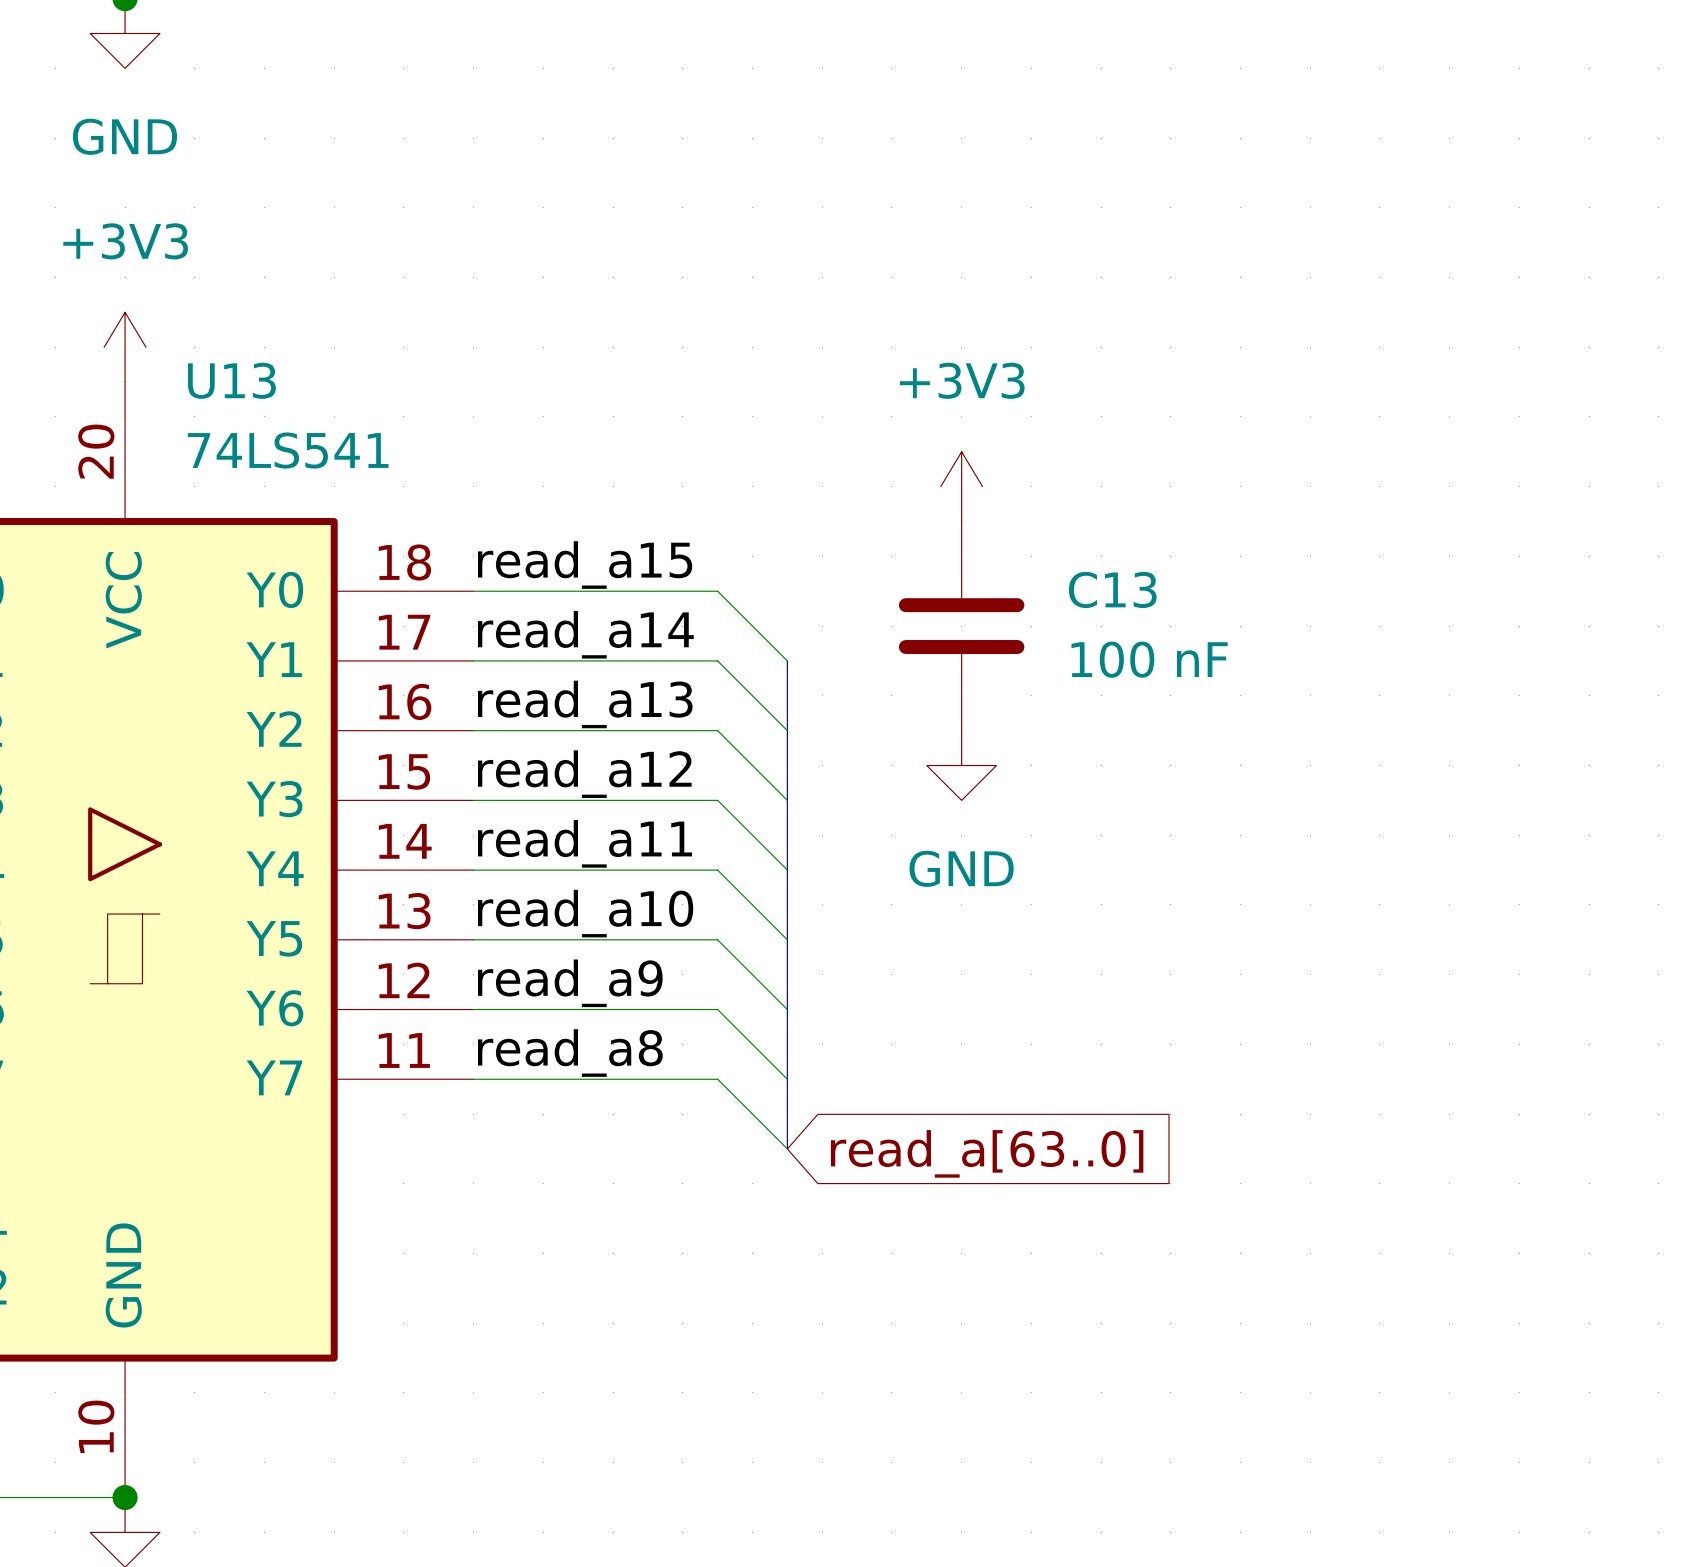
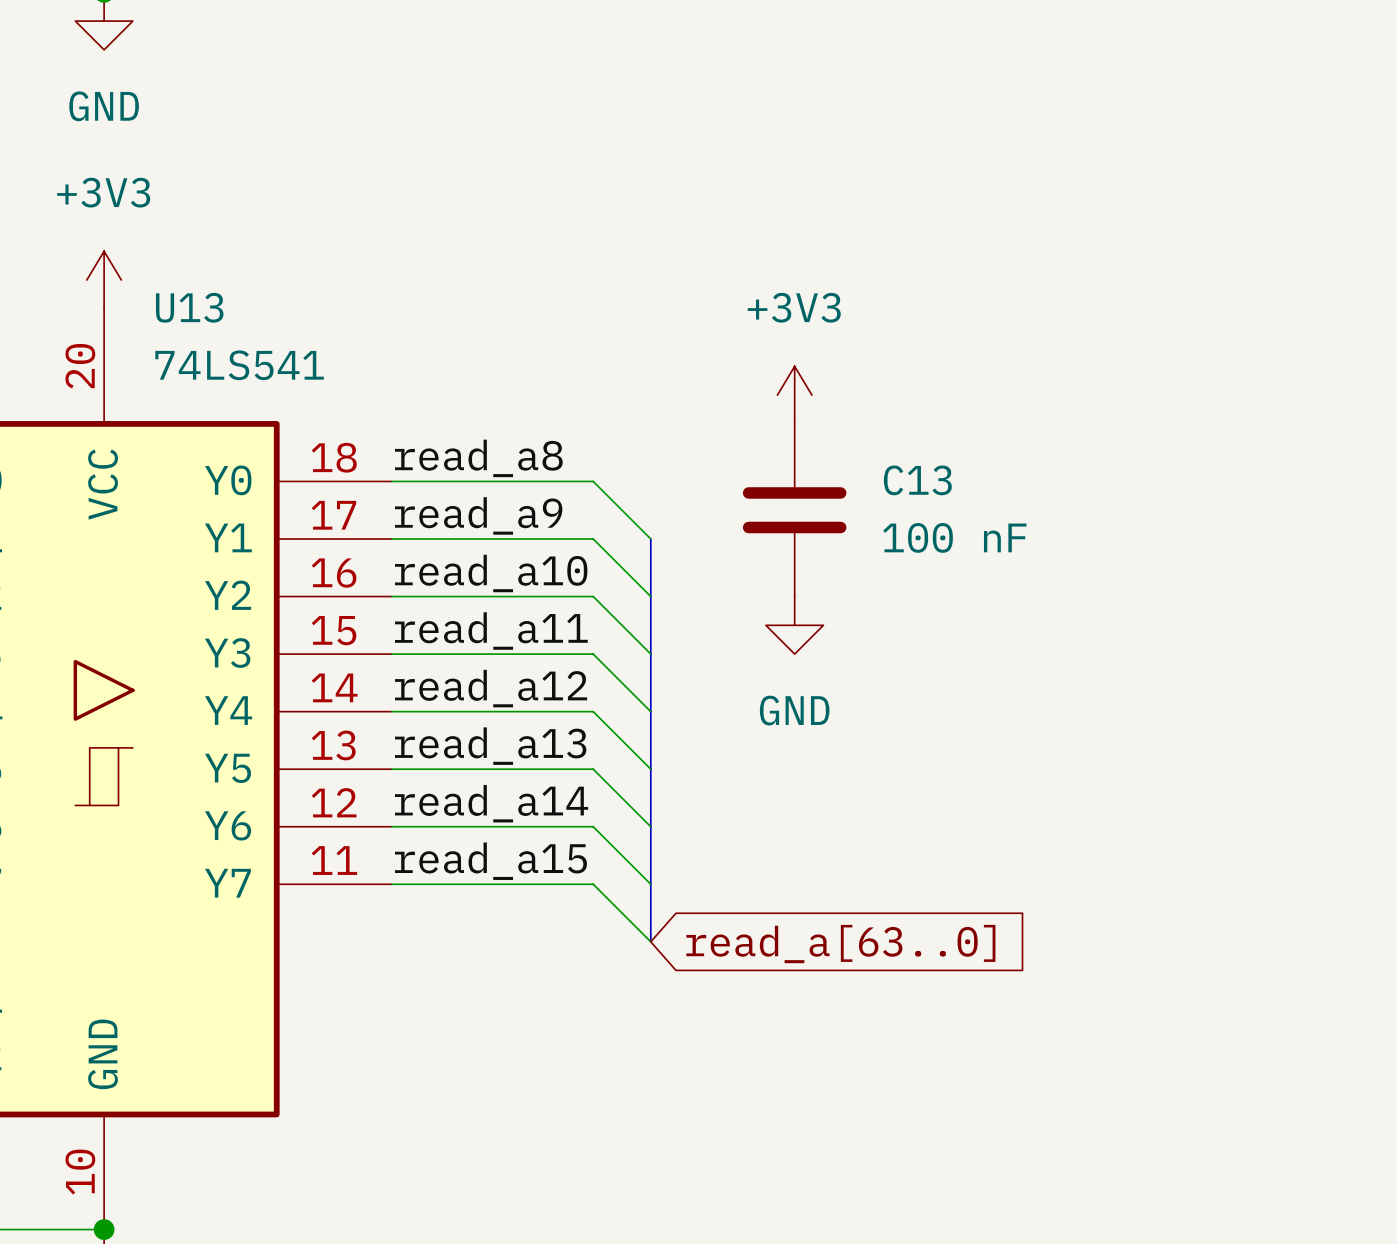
label: read_a15 (585, 565) -> read_a8 (478, 458)
label: read_a14 (585, 634) -> read_a9 (478, 515)
label: read_a13 (585, 704) -> read_a10 (491, 573)
label: read_a12 (584, 774) -> read_a11 (491, 631)
label: read_a11 (584, 843) -> read_a12 (491, 688)
label: read_a10 (585, 913) -> read_a13 (490, 746)
label: read_a9 (570, 983) -> read_a14 (491, 803)
label: read_a8 (570, 1053) -> read_a15 (490, 861)

